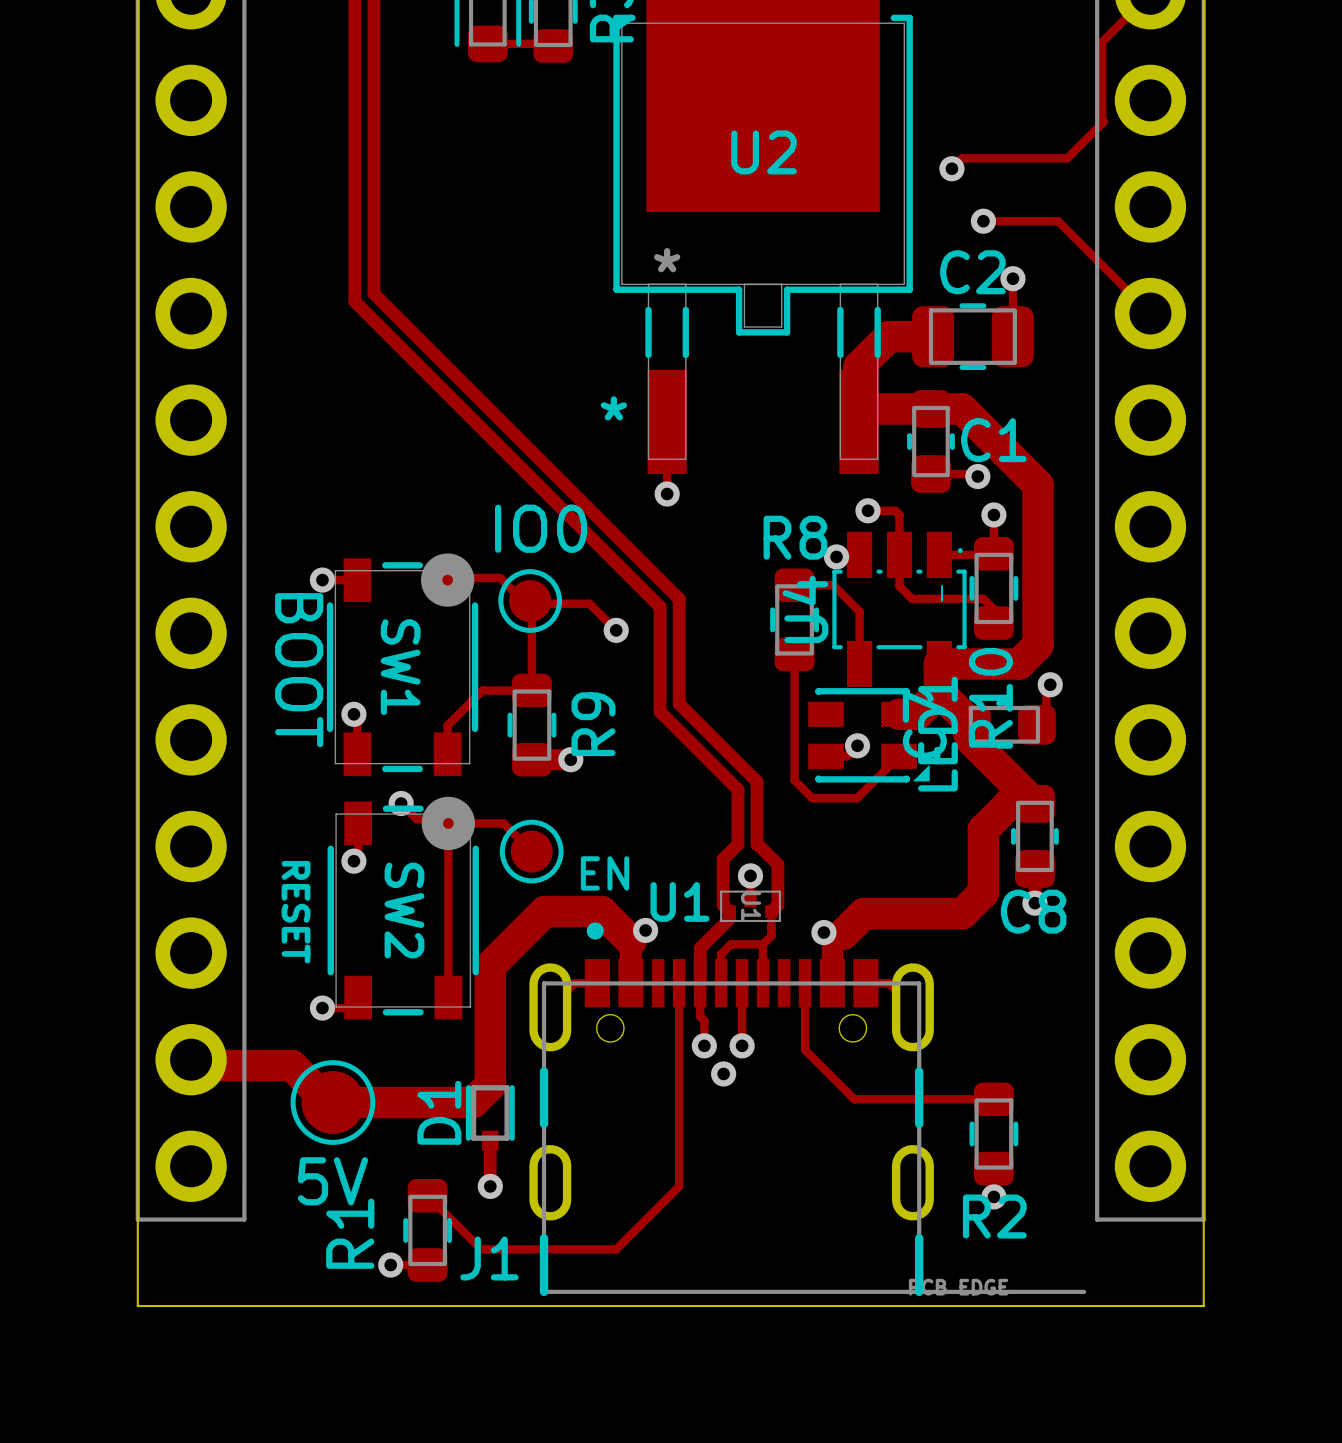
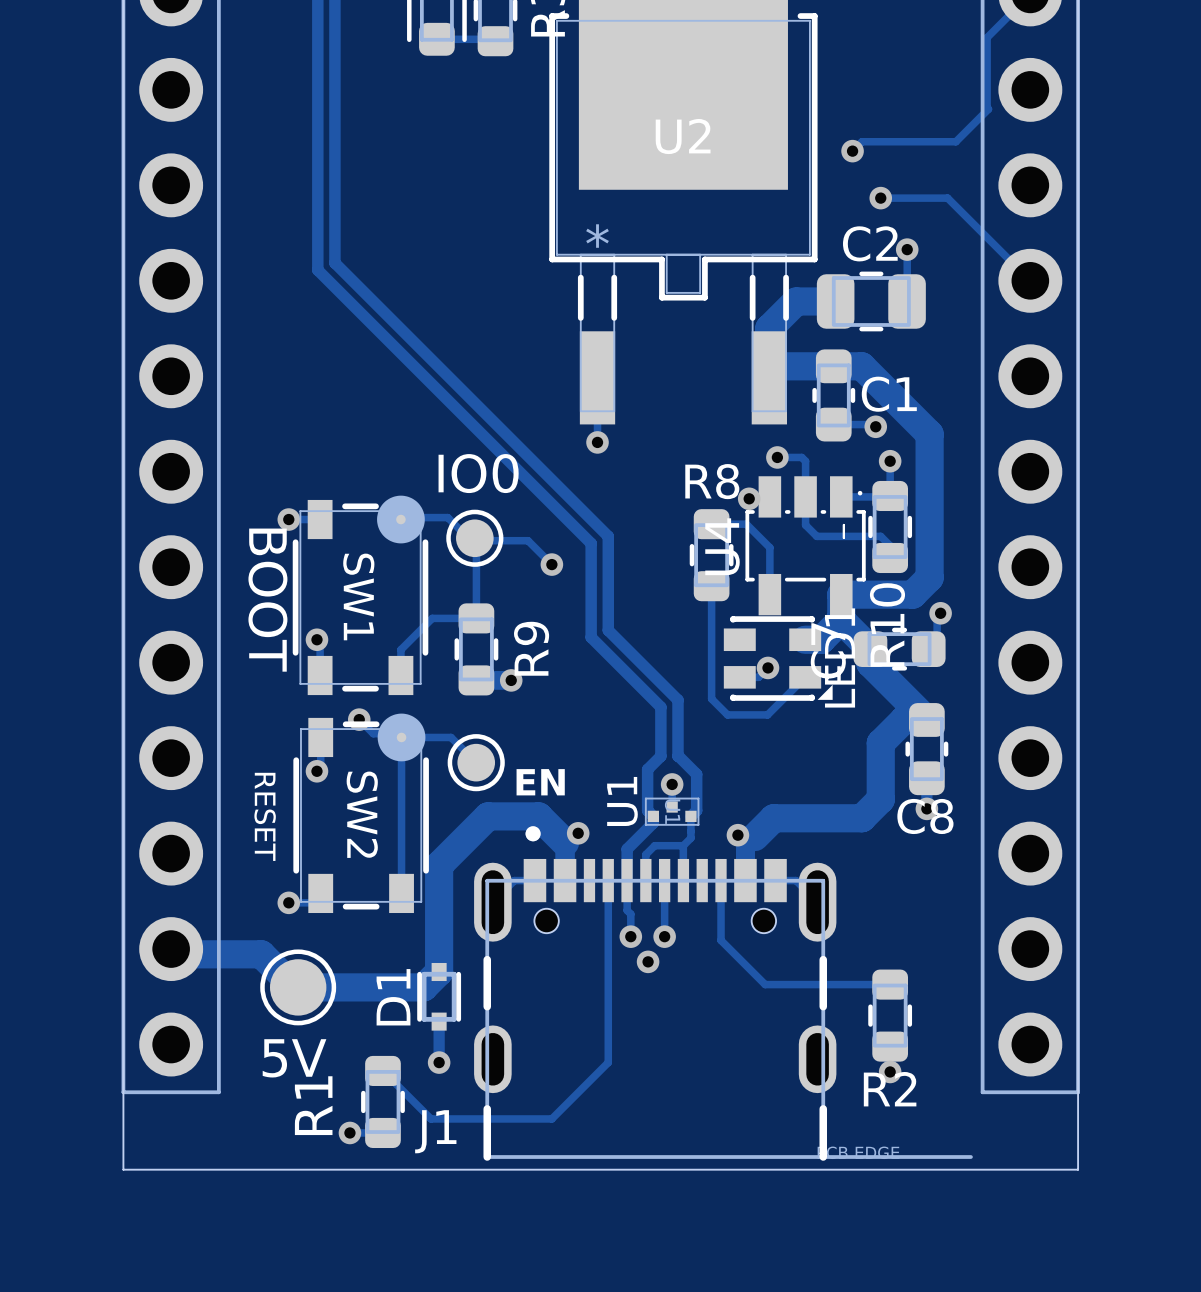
U2 text: * (613, 408) -> none
U1 text rotation: 0° (679, 901) -> 90° counterclockwise (622, 801)

